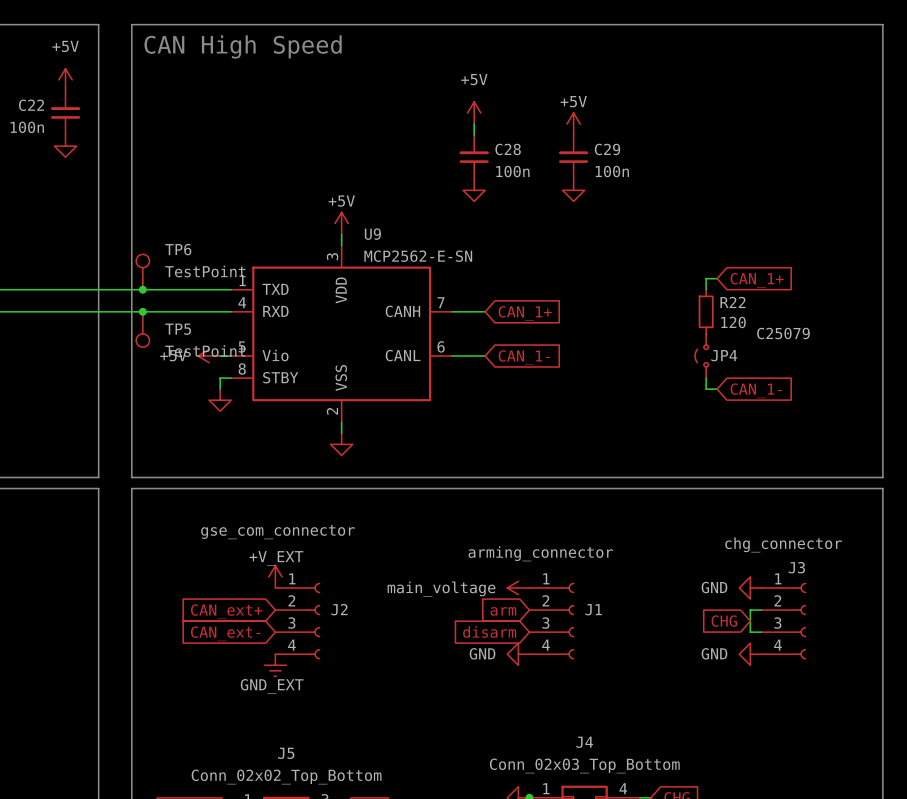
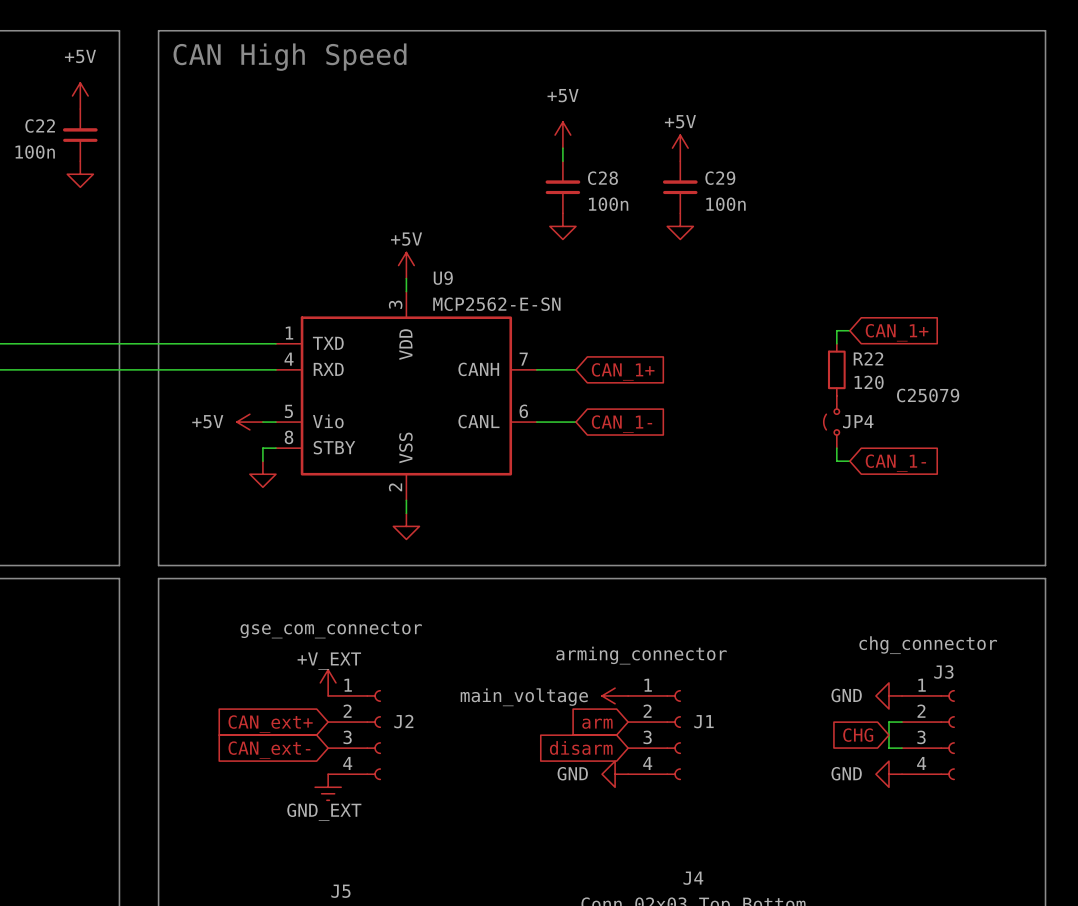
TP6: TestPoint (142, 272) -> none
junction: (142, 289) -> none
junction: (142, 311) -> none
TP5: TestPoint (142, 329) -> none

